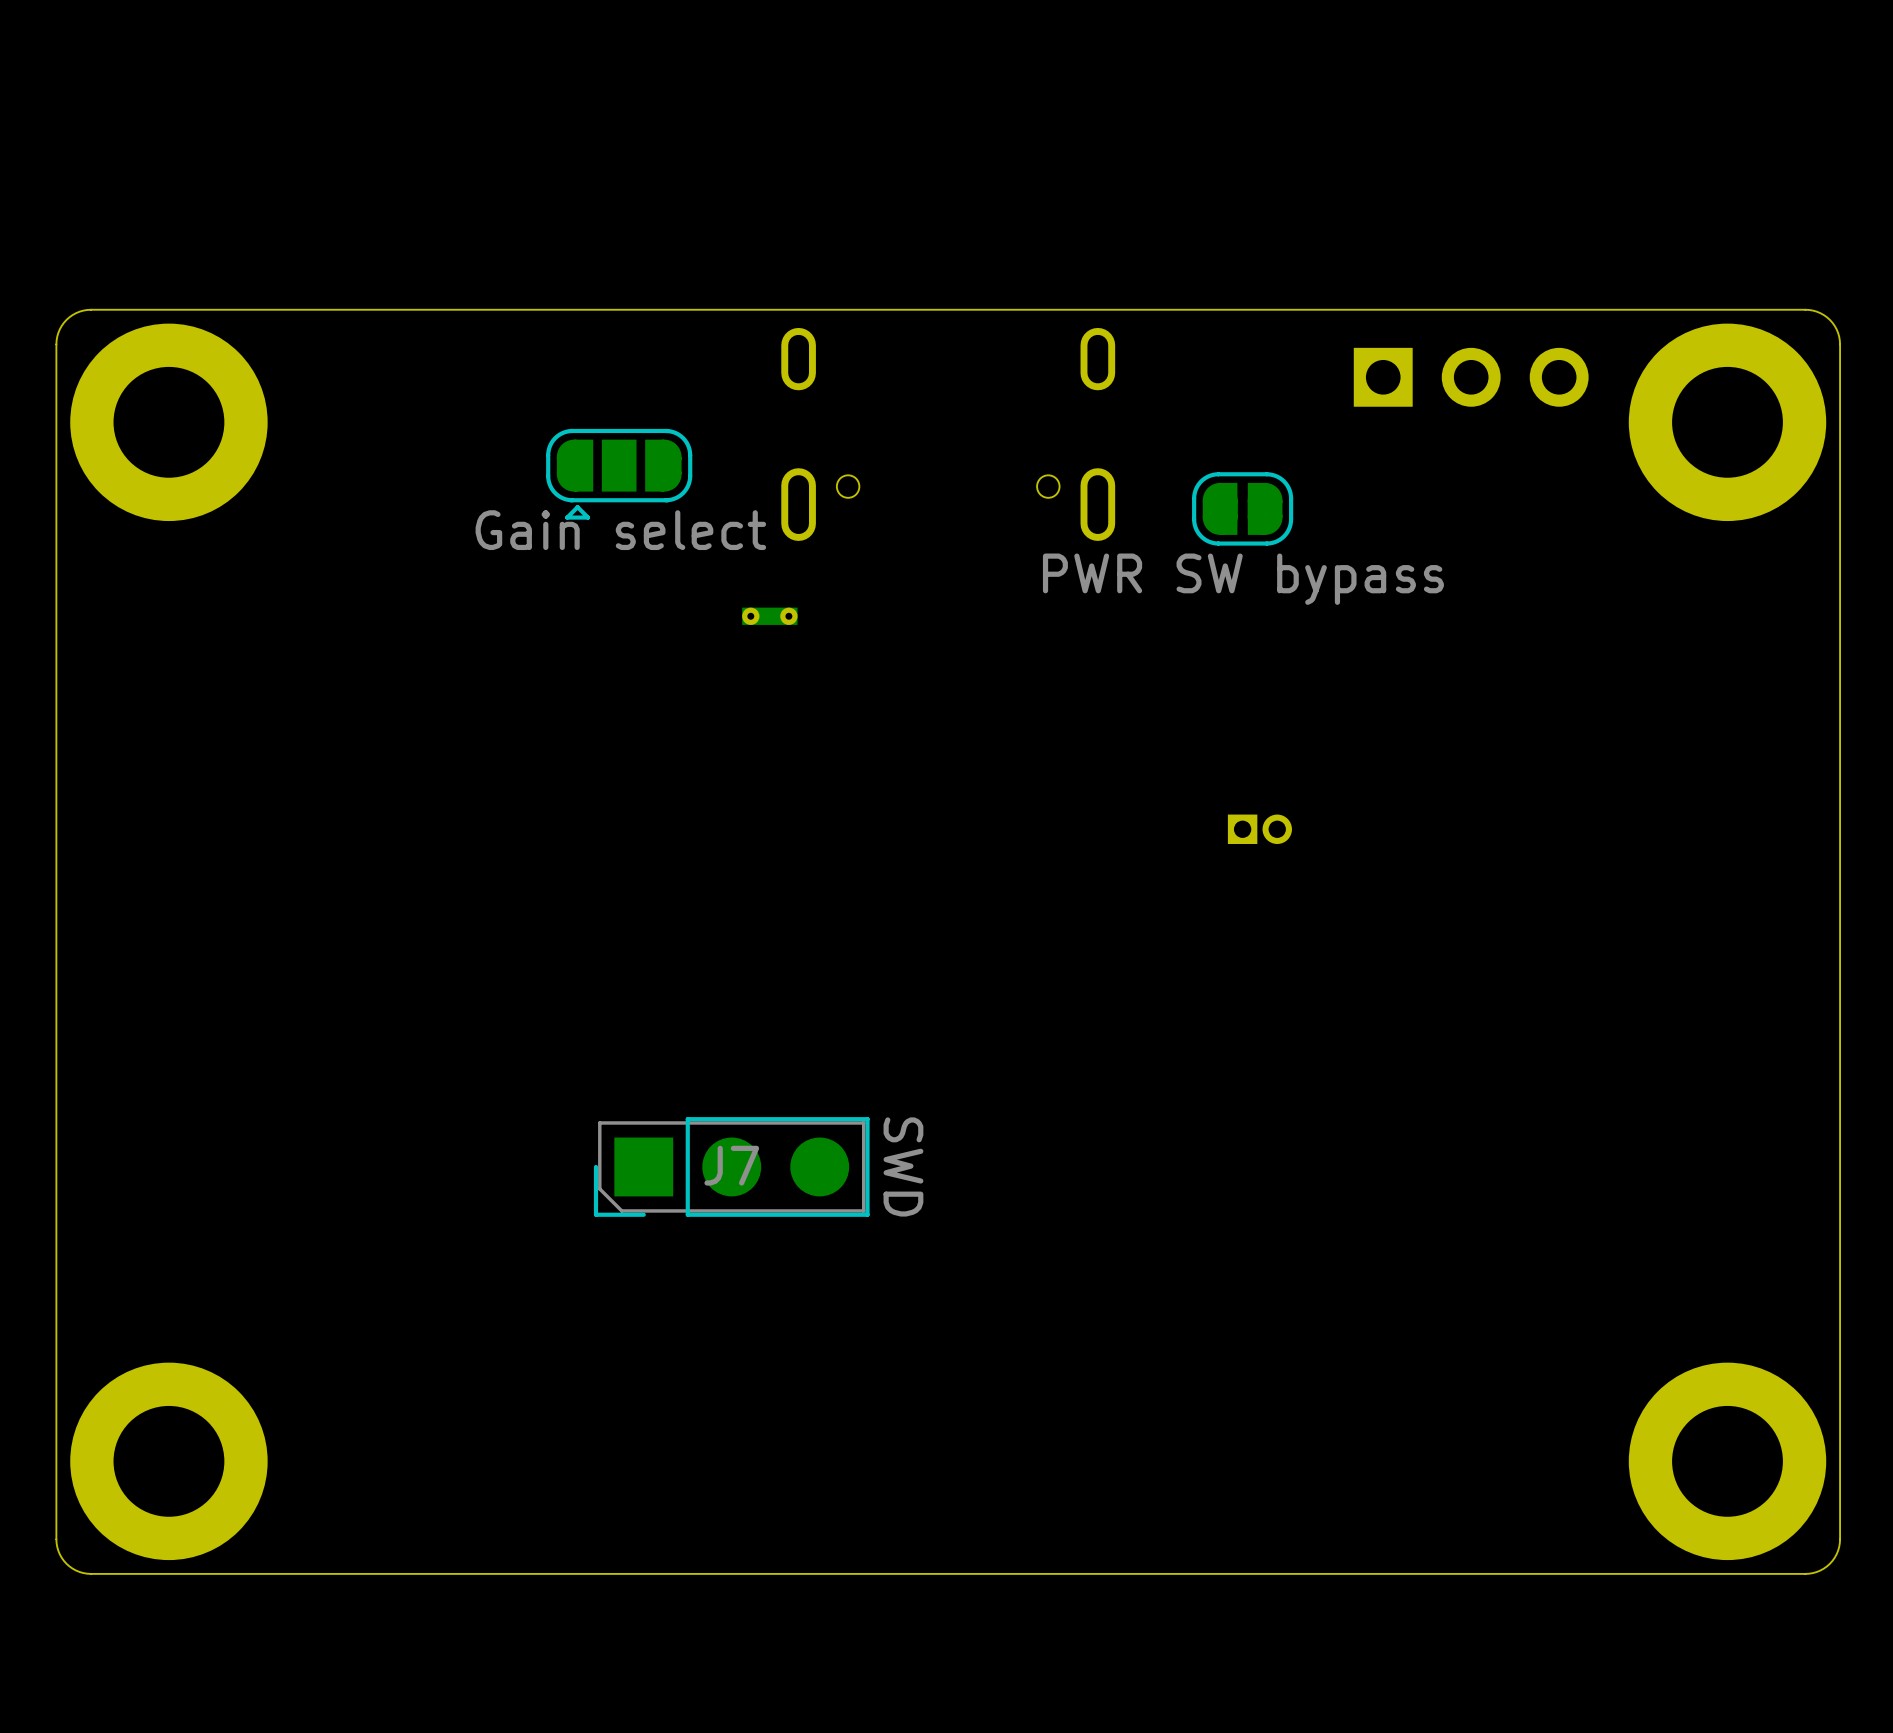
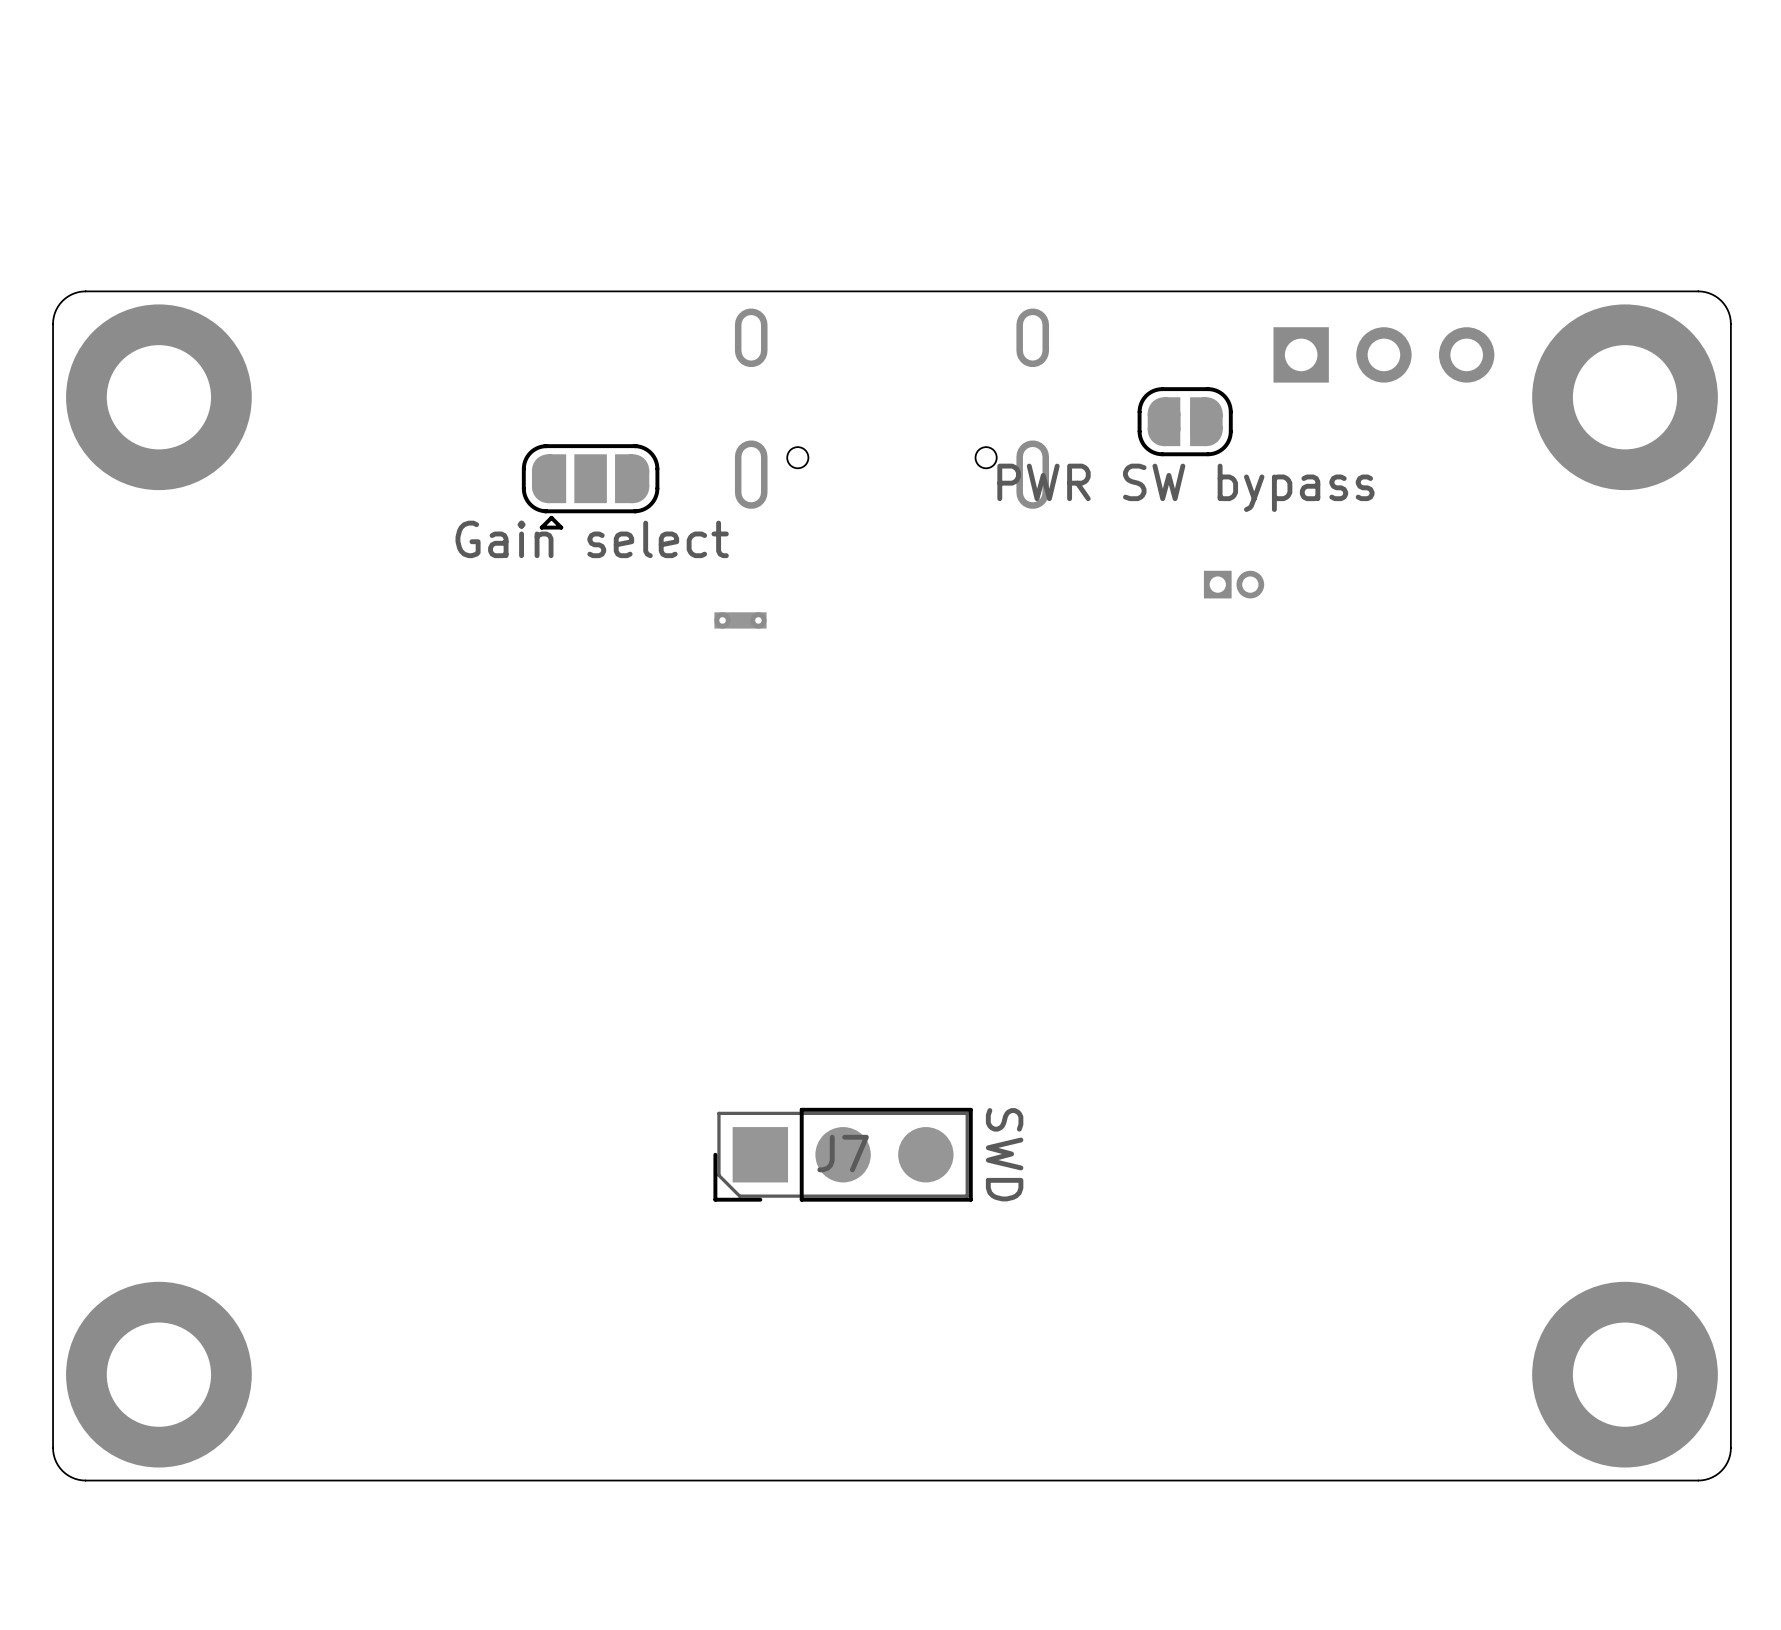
part position: (619, 474) -> (590, 486)
part position: (1242, 508) -> (1185, 421)
part position: (769, 616) -> (740, 620)
part position: (1259, 829) -> (1234, 584)
J7 position: (731, 1166) -> (843, 1154)

